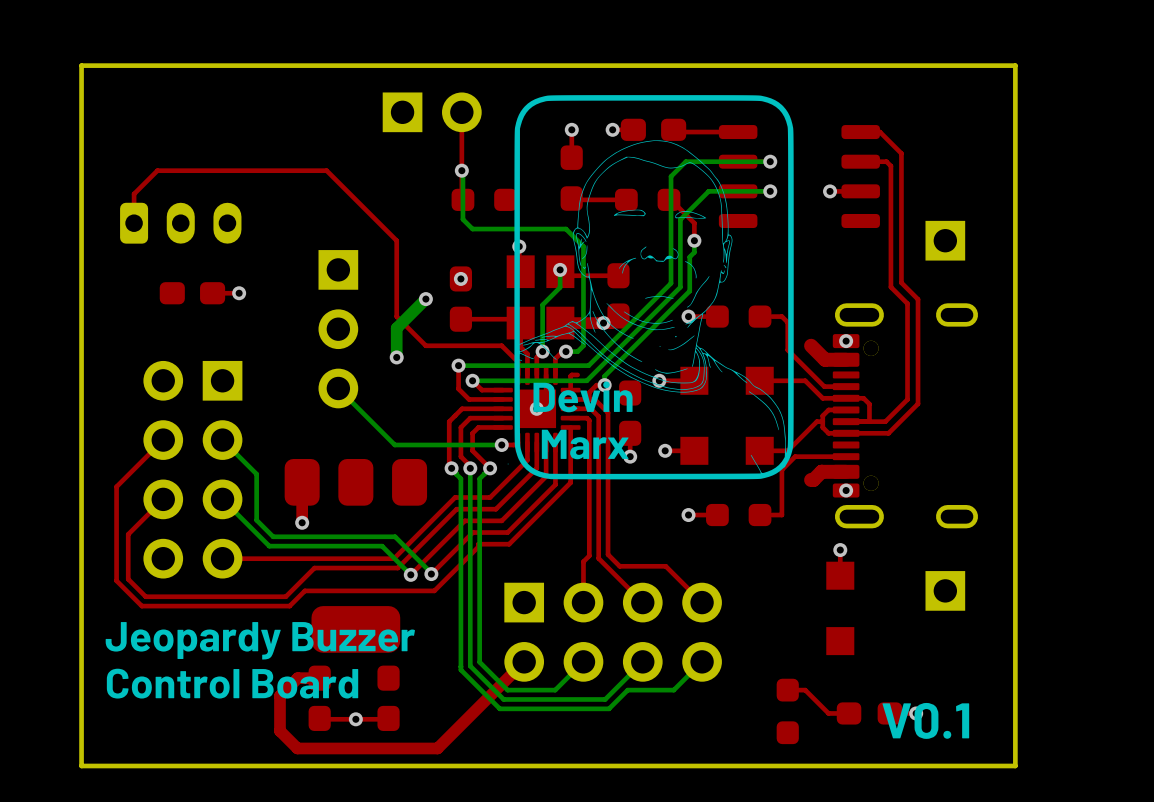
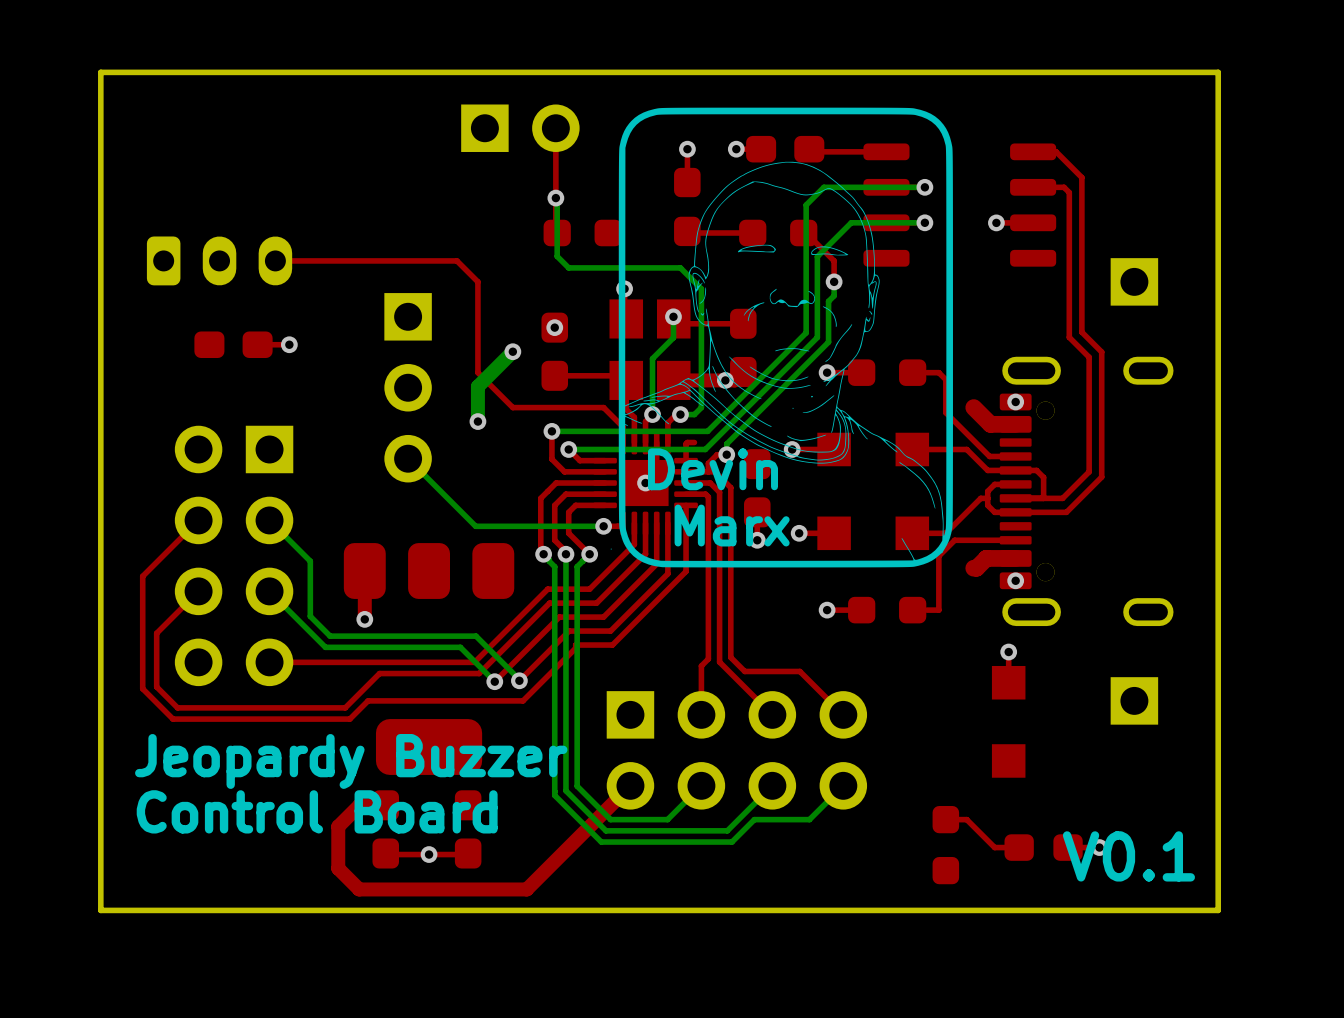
top track: (379, 223) (326, 170) (157, 170) (134, 194) (134, 223) -> (456, 260) (275, 260)

